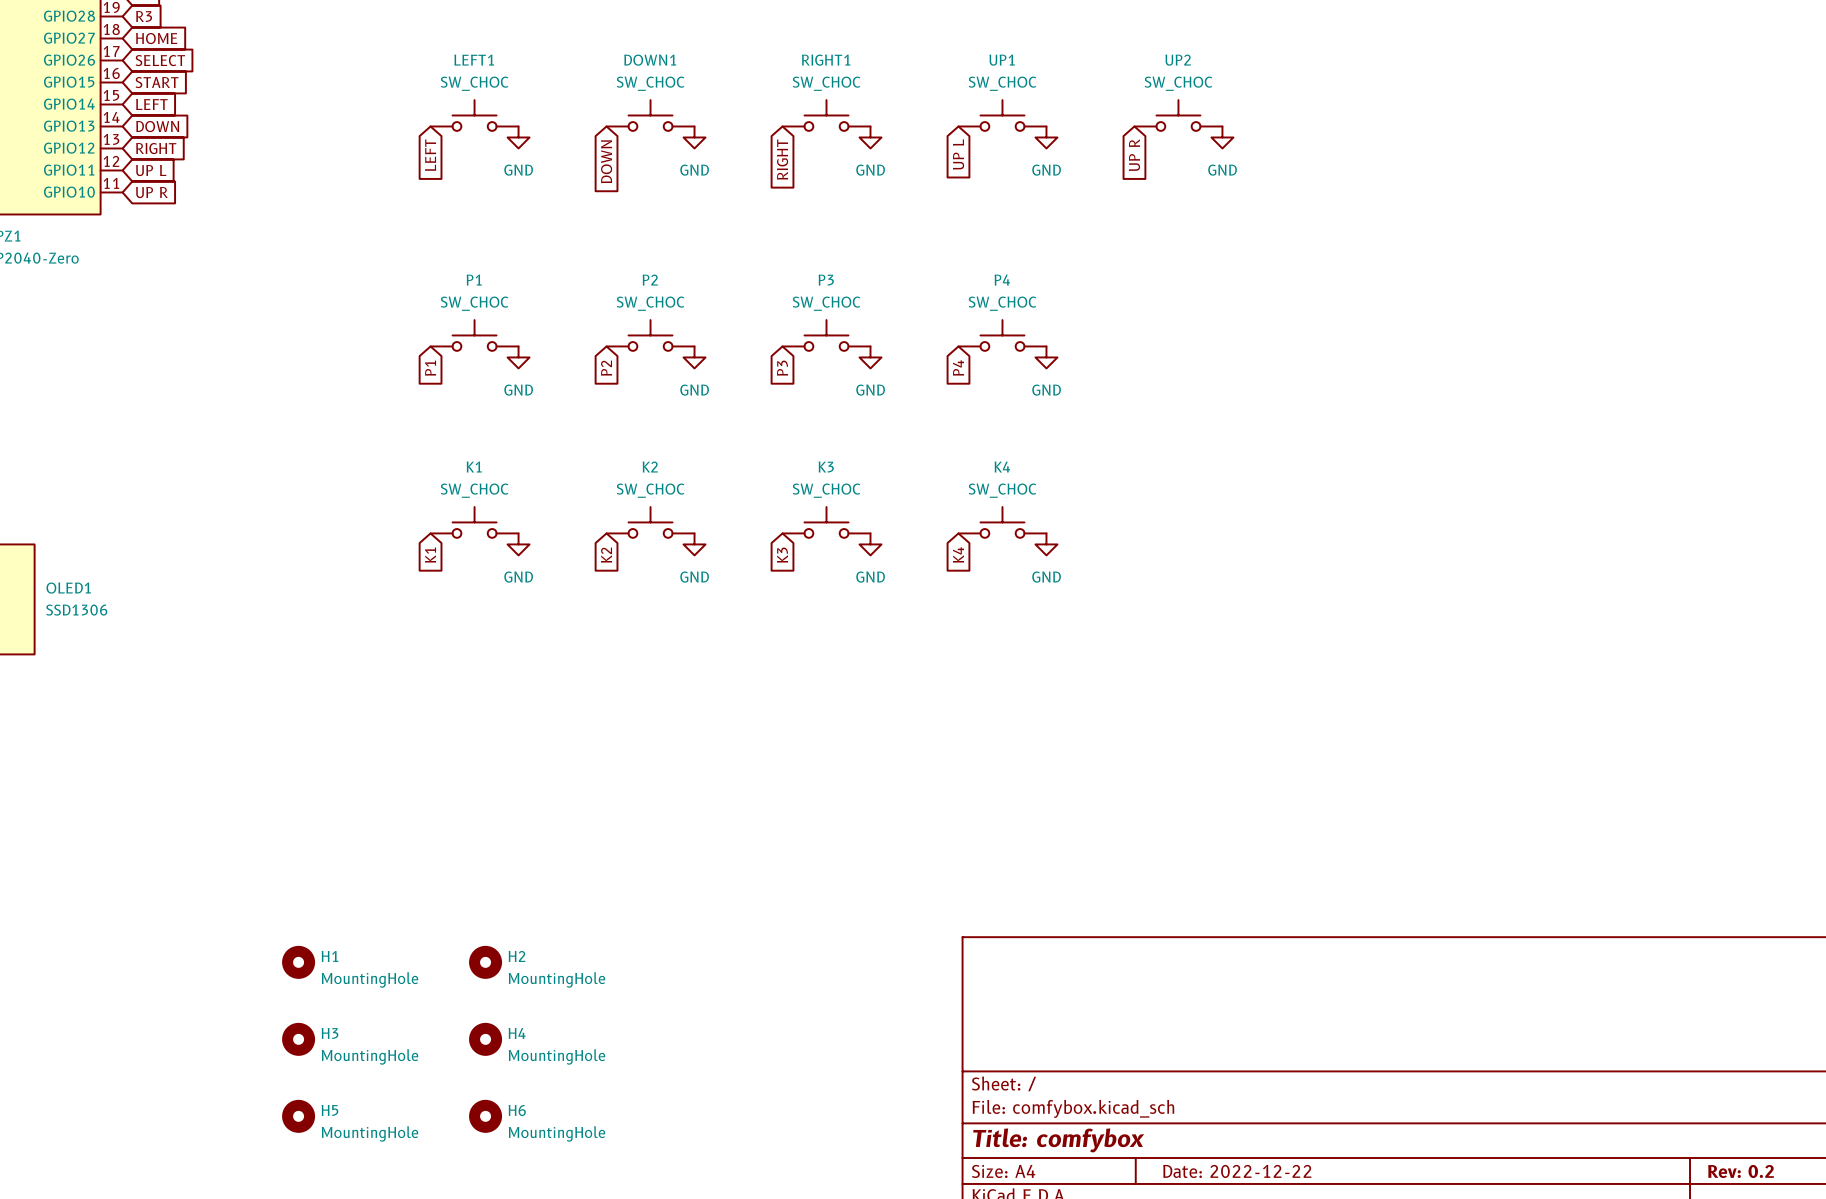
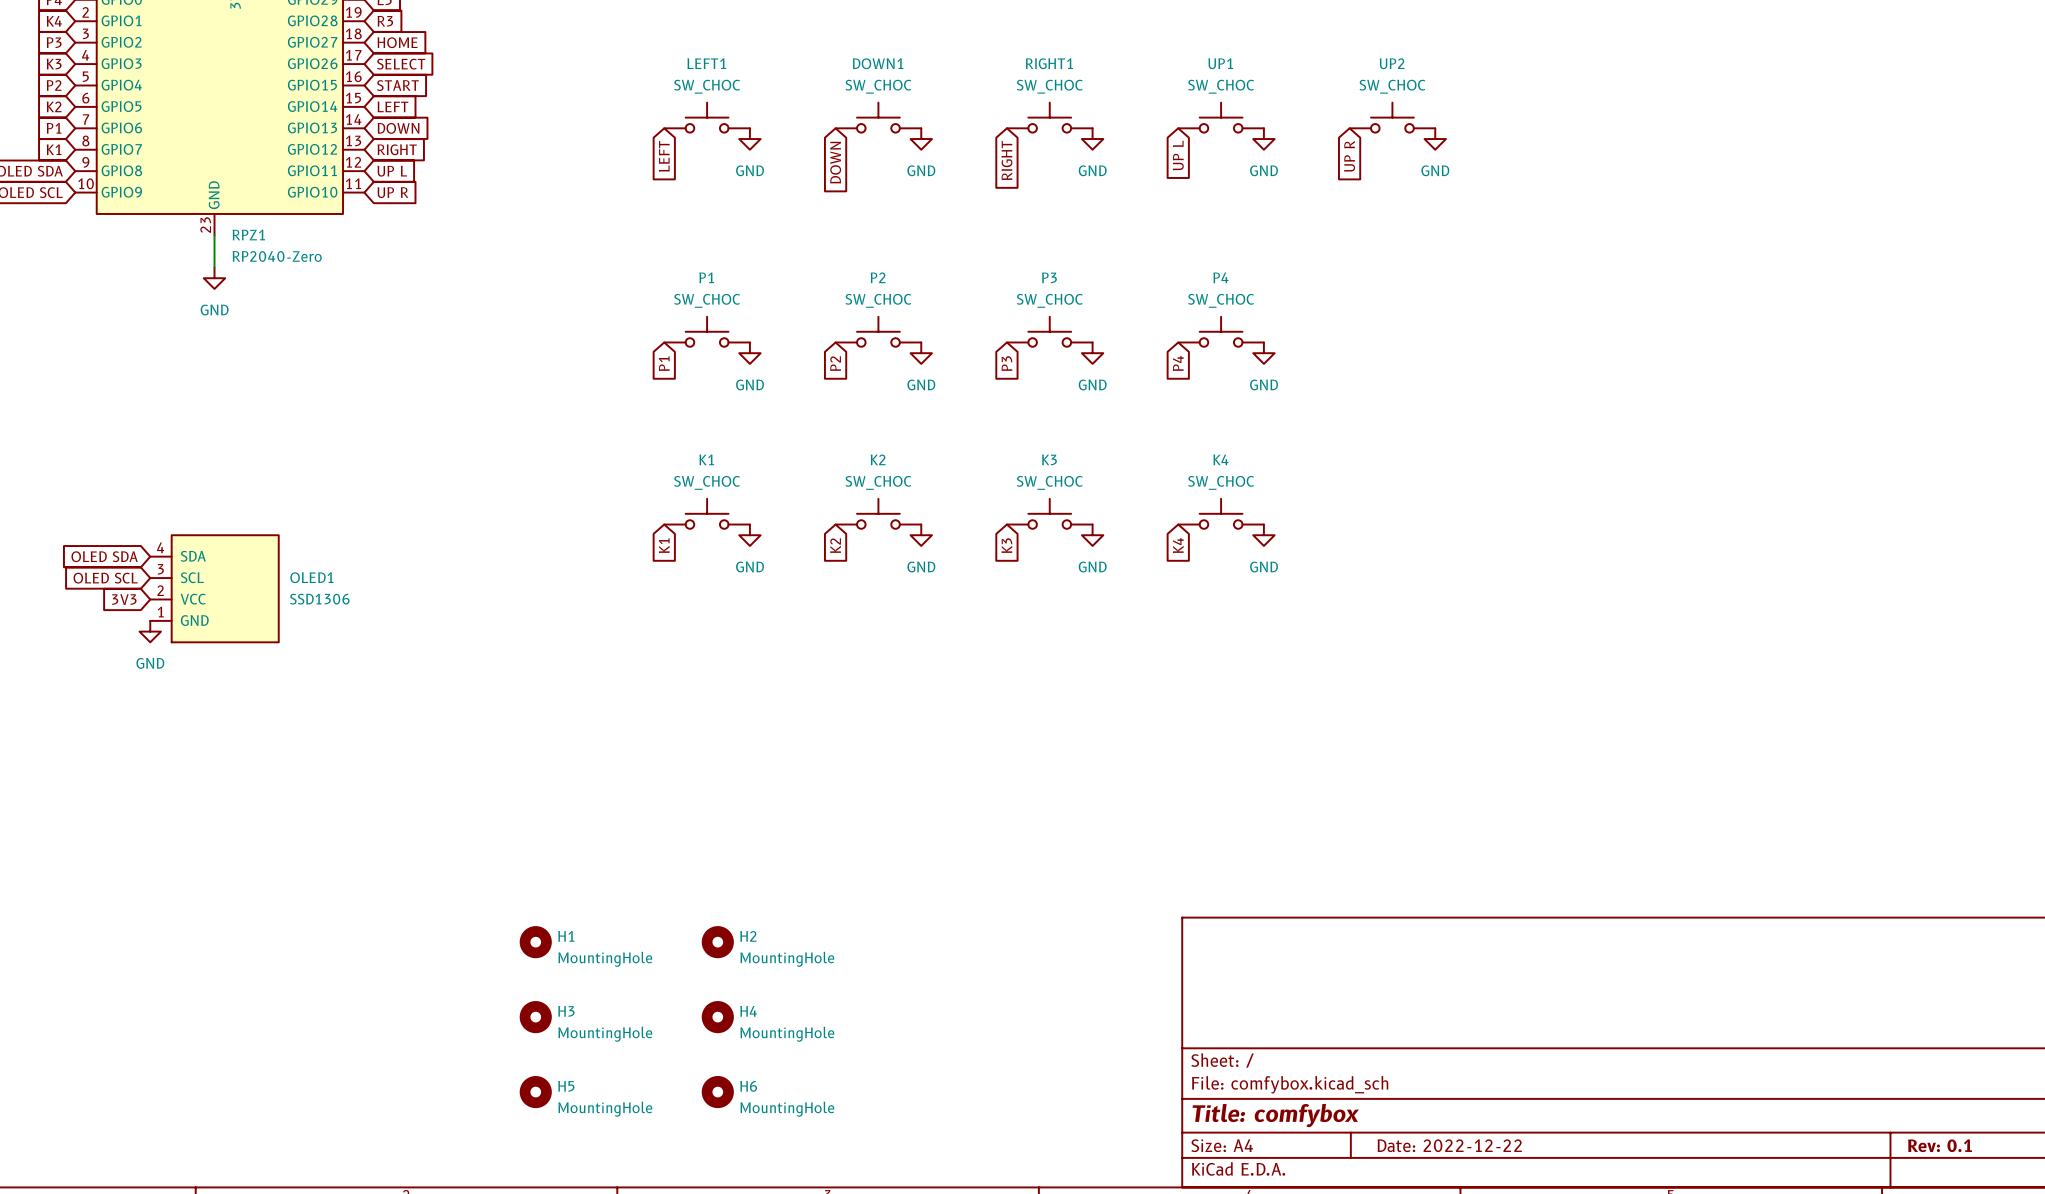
title block: Rev: 0.2 (1740, 1171) -> Rev: 0.1 (1940, 1145)

